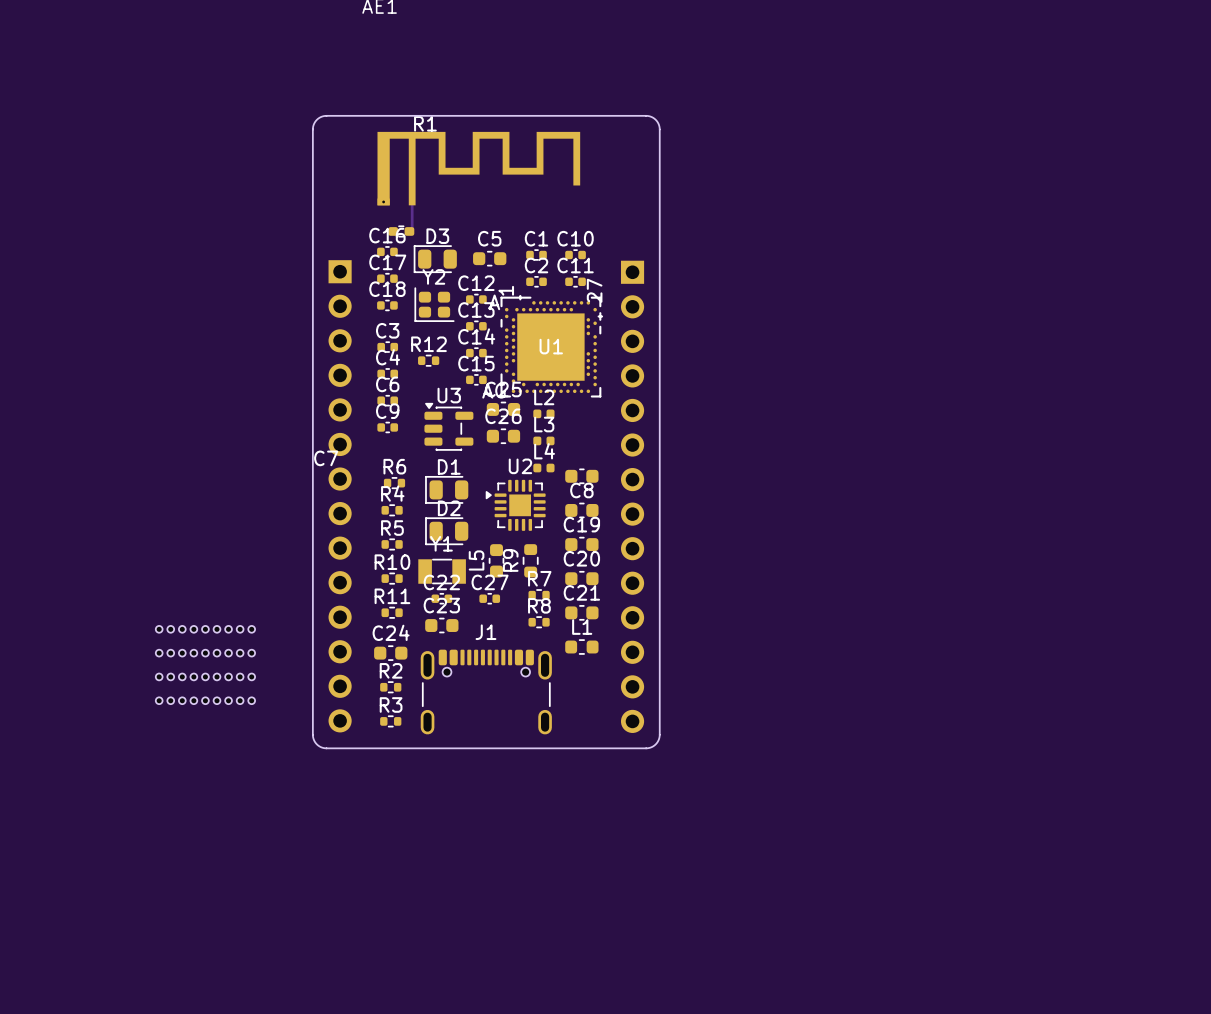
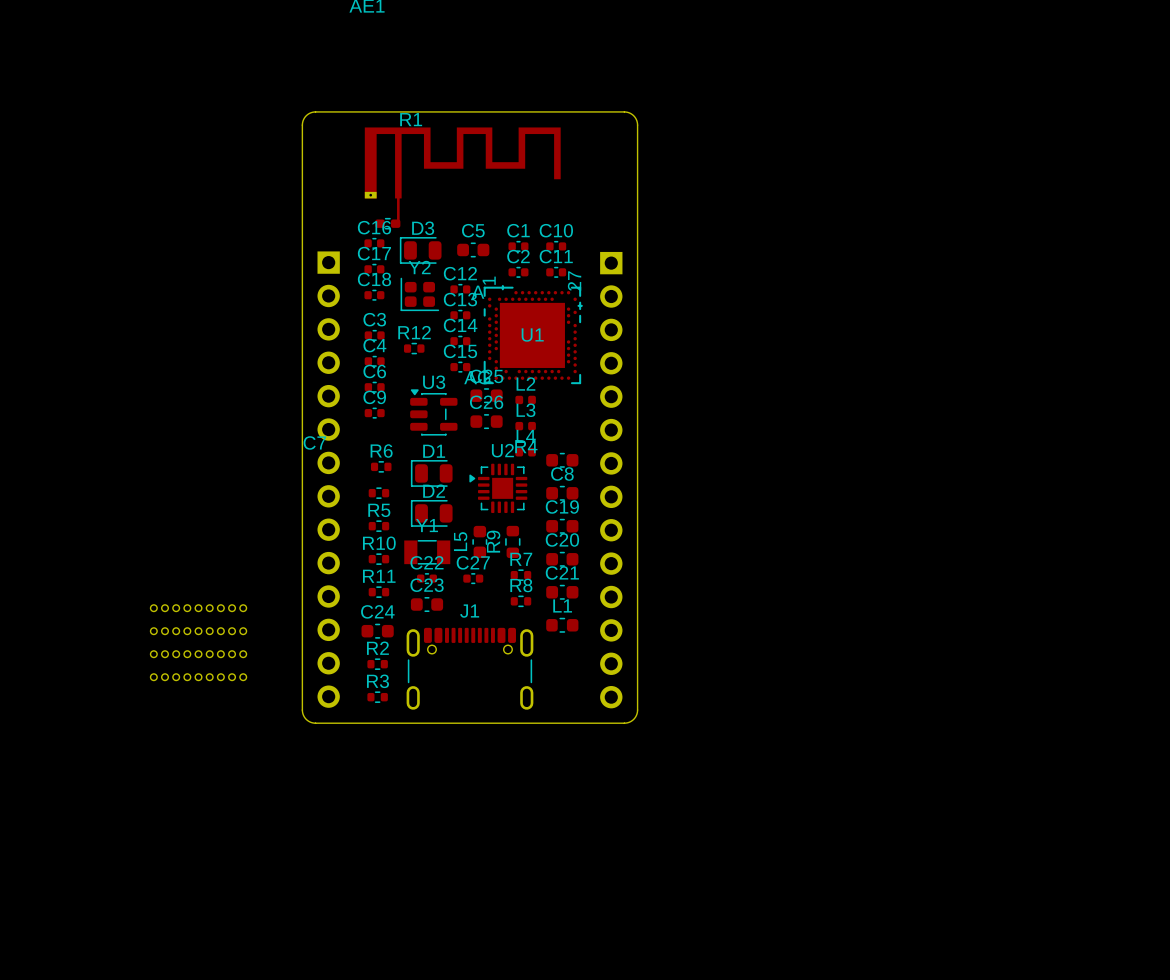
R4 name position: R4 (392, 493) -> R4 (526, 446)

